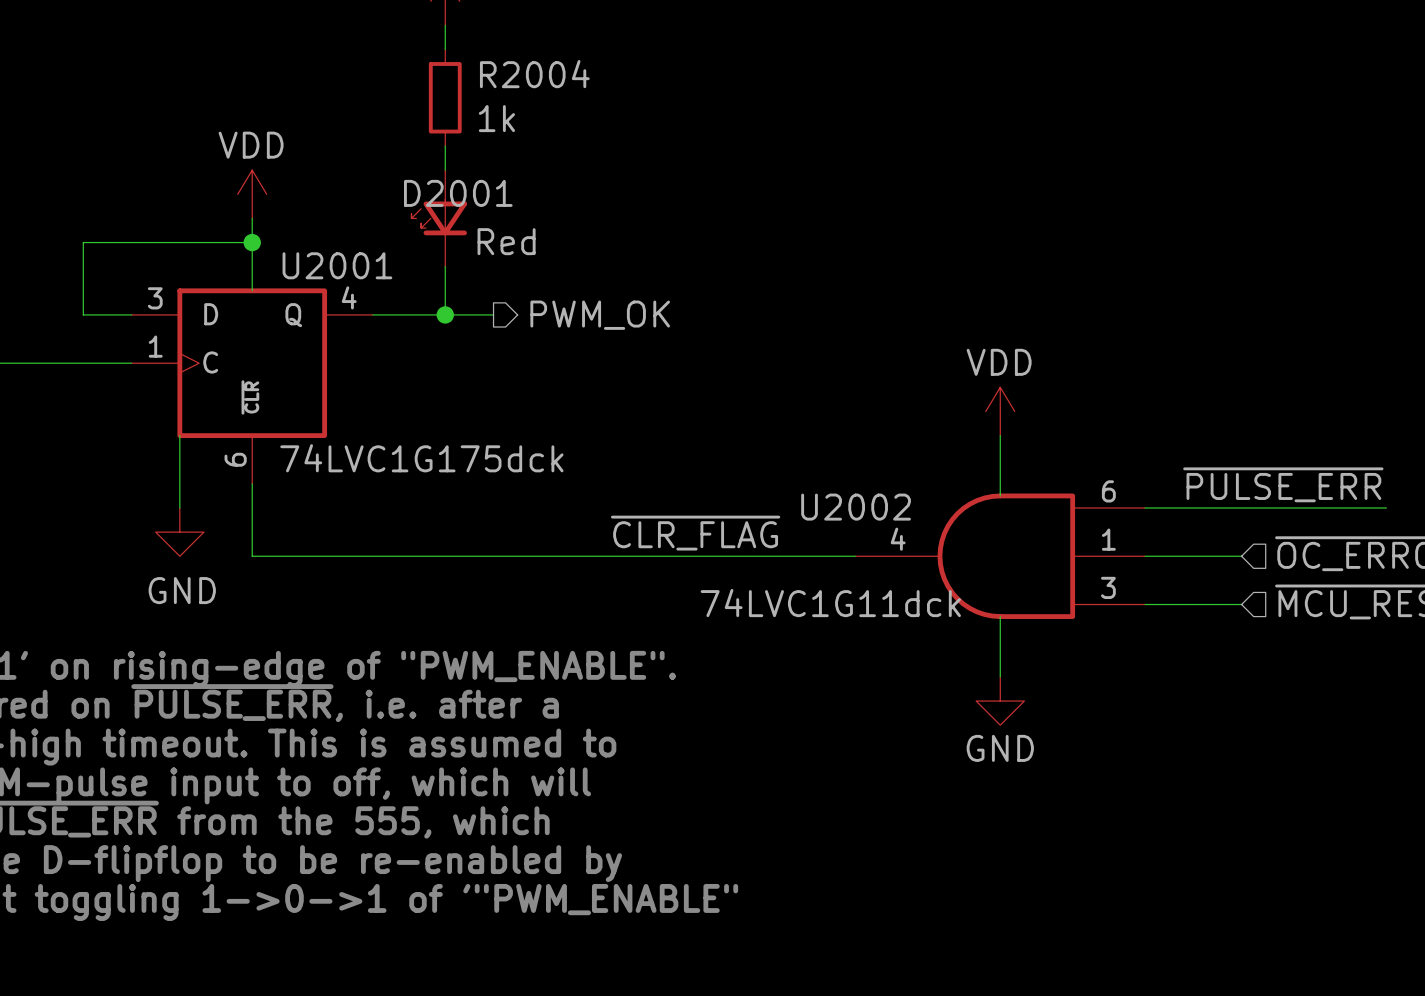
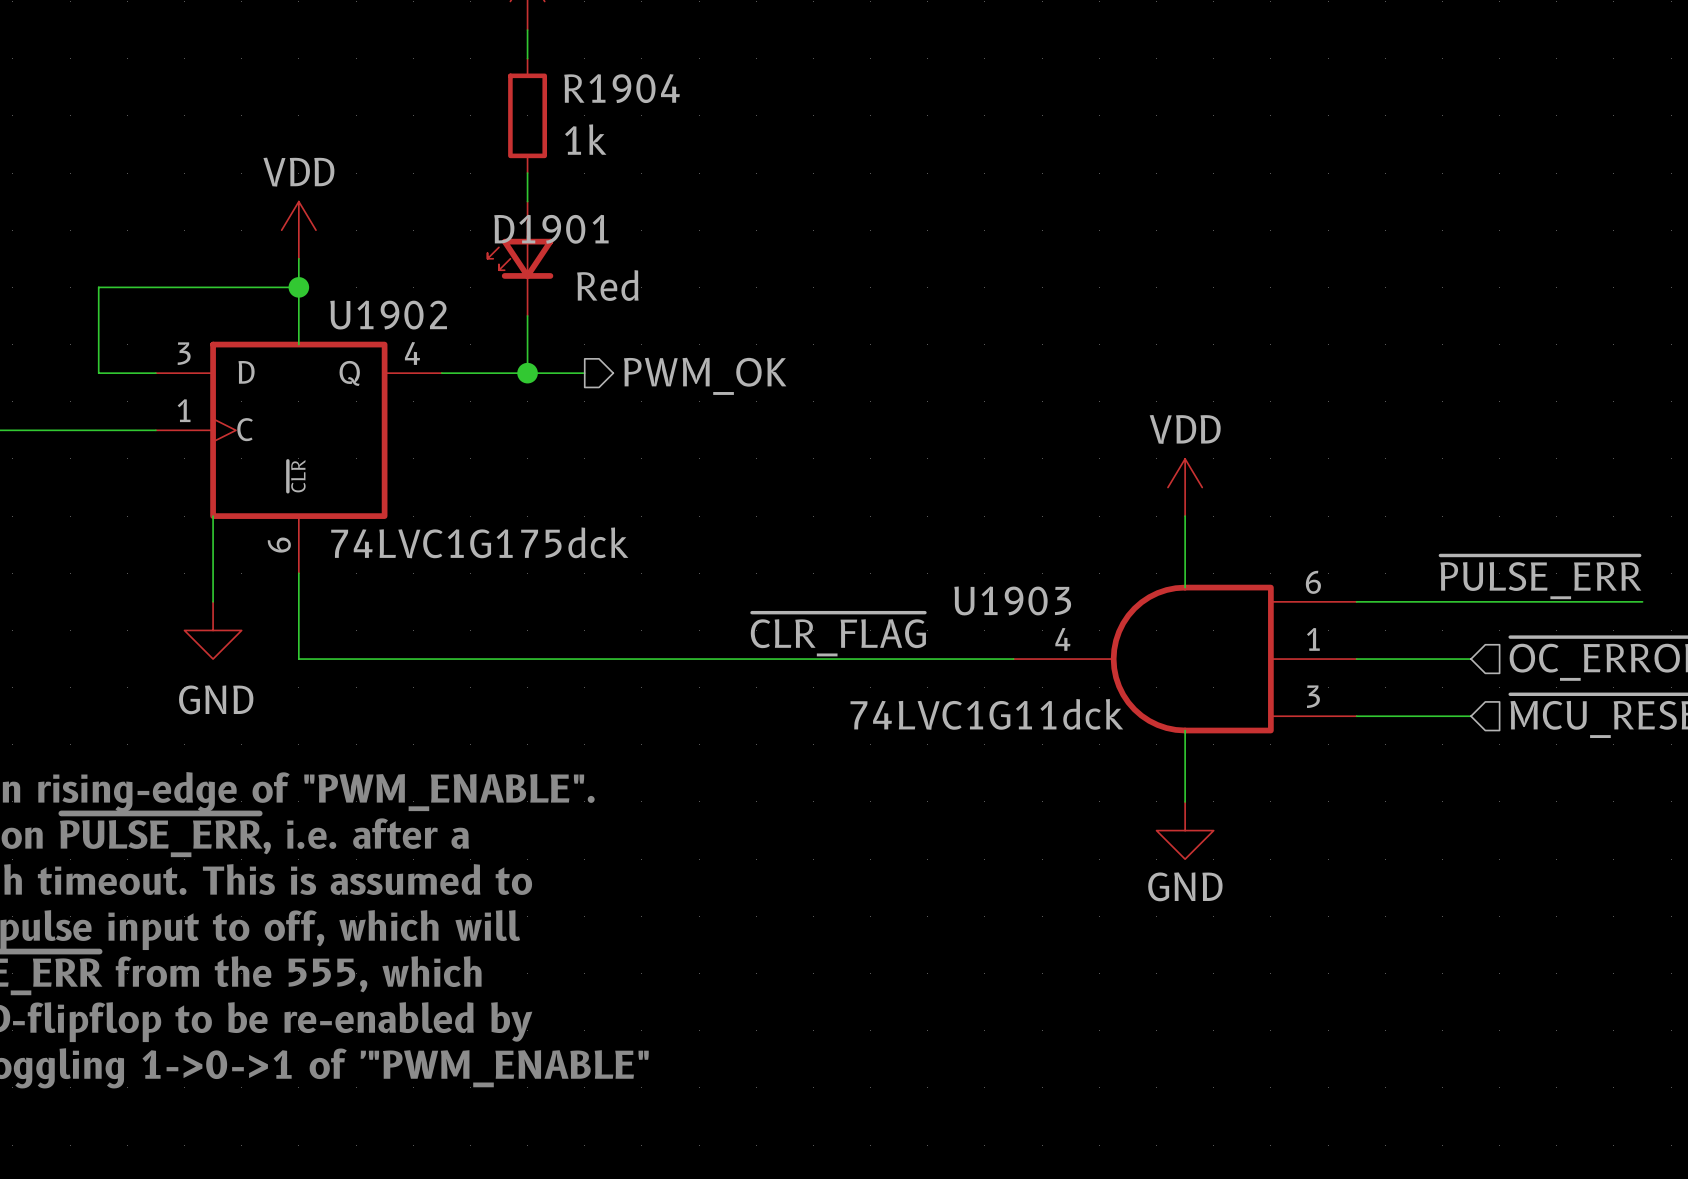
R2004 name: R2004 (534, 74) -> R1904 (622, 88)
D2001 name: D2001 (458, 193) -> D1901 (551, 229)
U2001 name: U2001 (337, 265) -> U1902 (388, 315)
U2002 name: U2002 (856, 507) -> U1903 (1012, 600)

